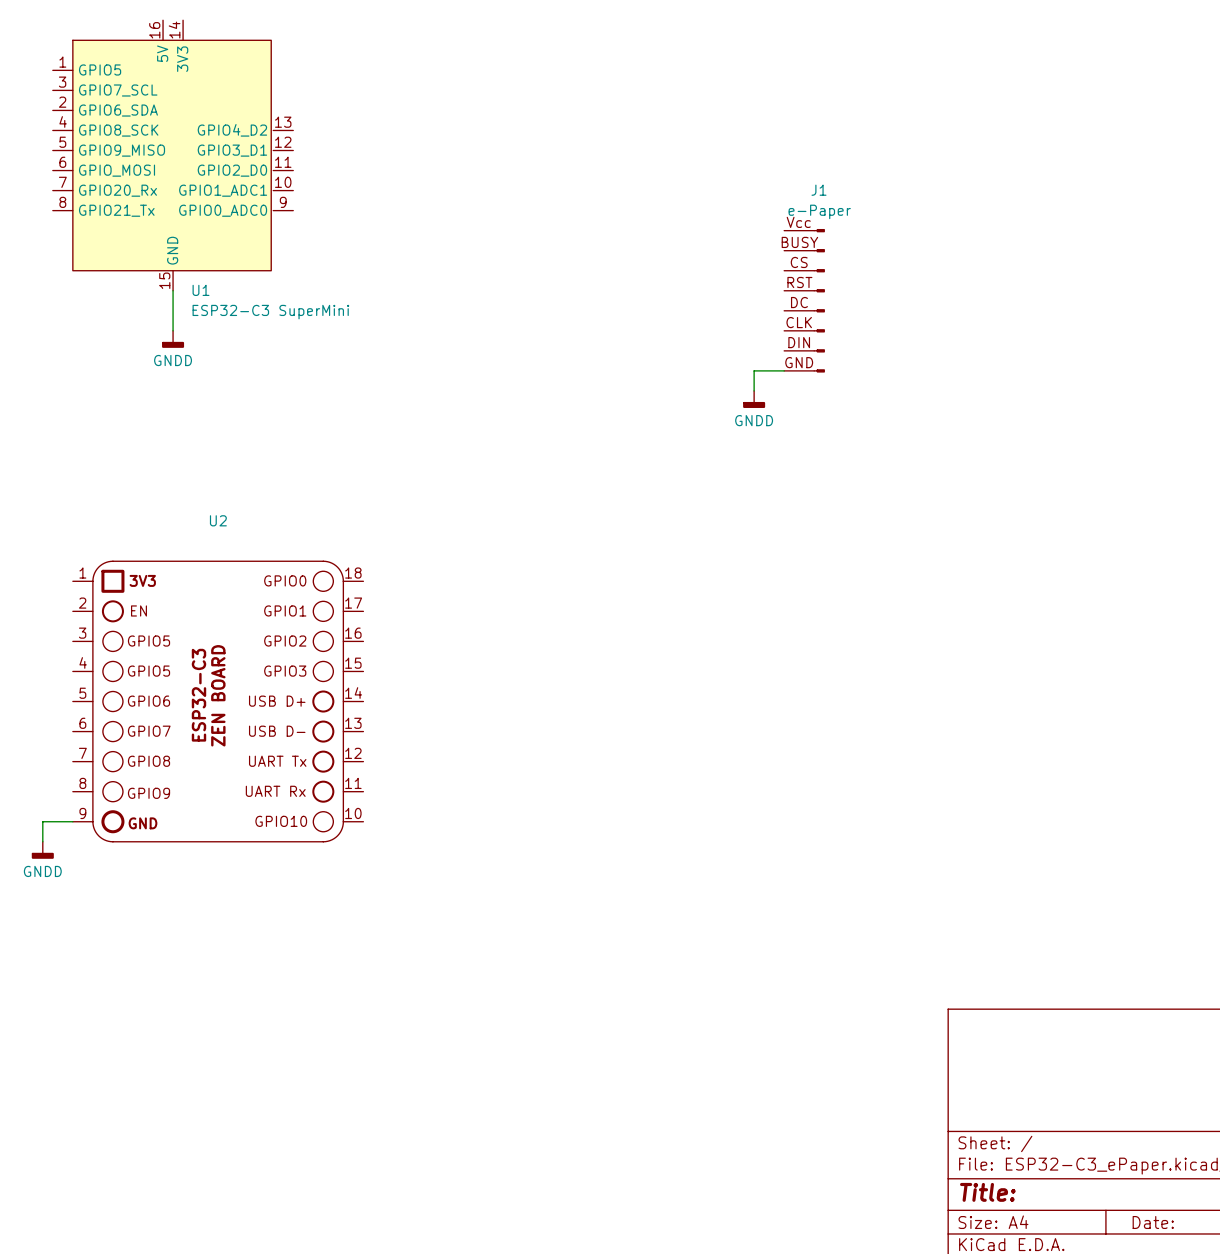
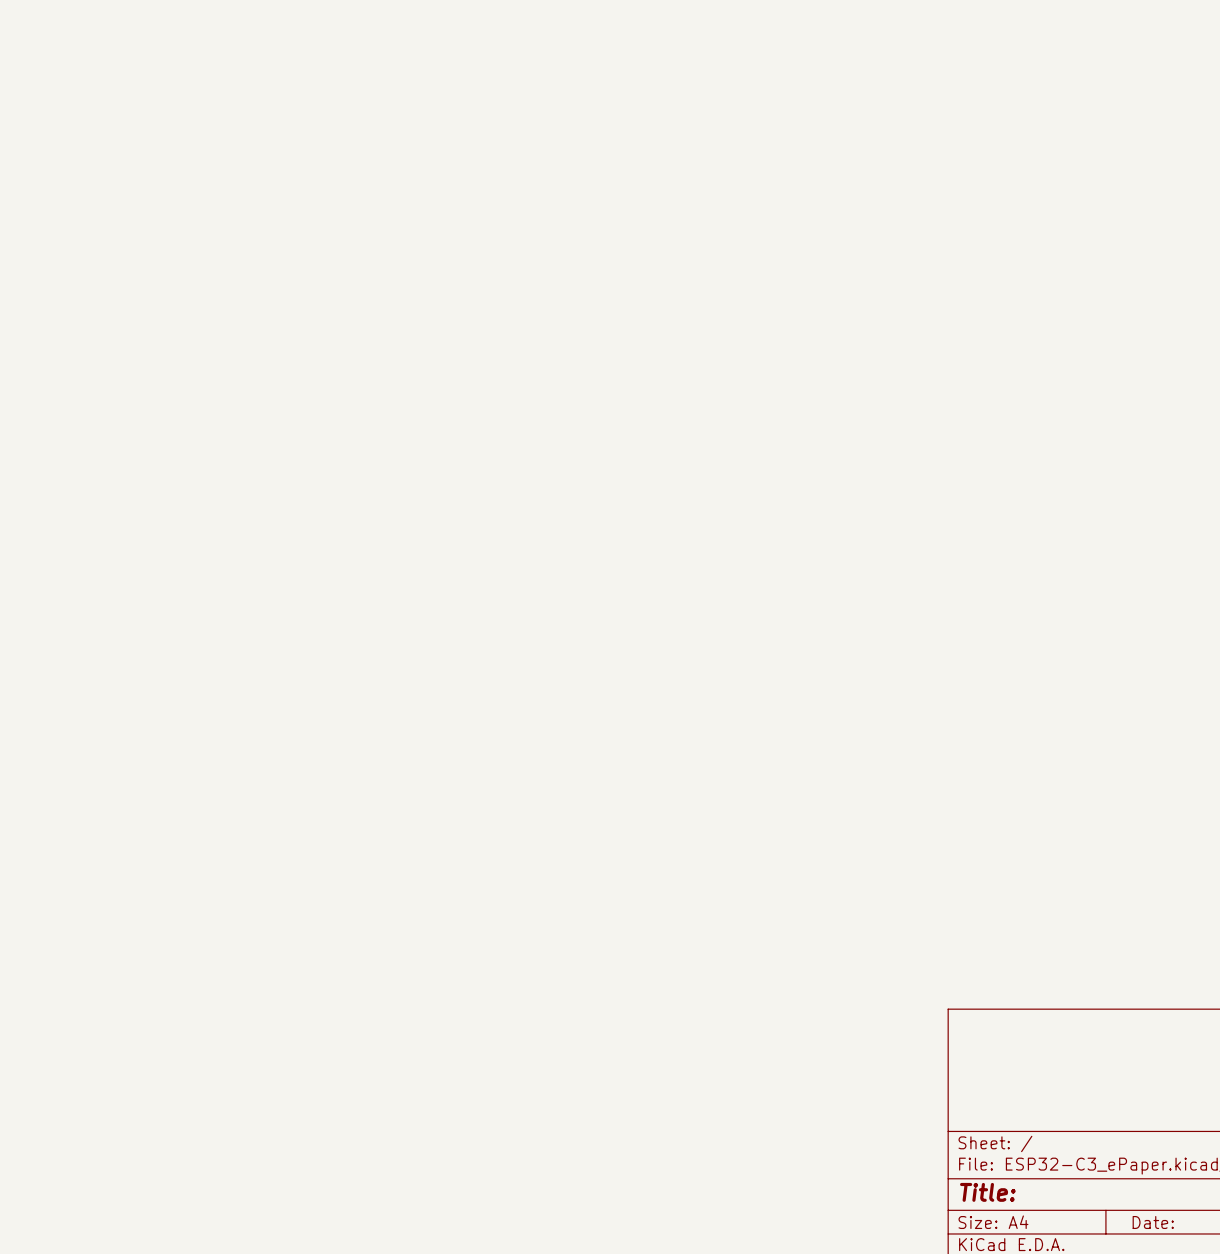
U1: ESP32-C3 SuperMini (173, 155) -> none
wire: (173, 290) (173, 330) -> none
J1: e-Paper (804, 300) -> none
power symbol: GNDD (173, 339) -> none
wire: (784, 370) (754, 370) (754, 390) -> none
power symbol: GNDD (754, 399) -> none
U2: (218, 701) -> none
wire: (72, 821) (42, 821) (42, 841) -> none
power symbol: GNDD (42, 850) -> none

